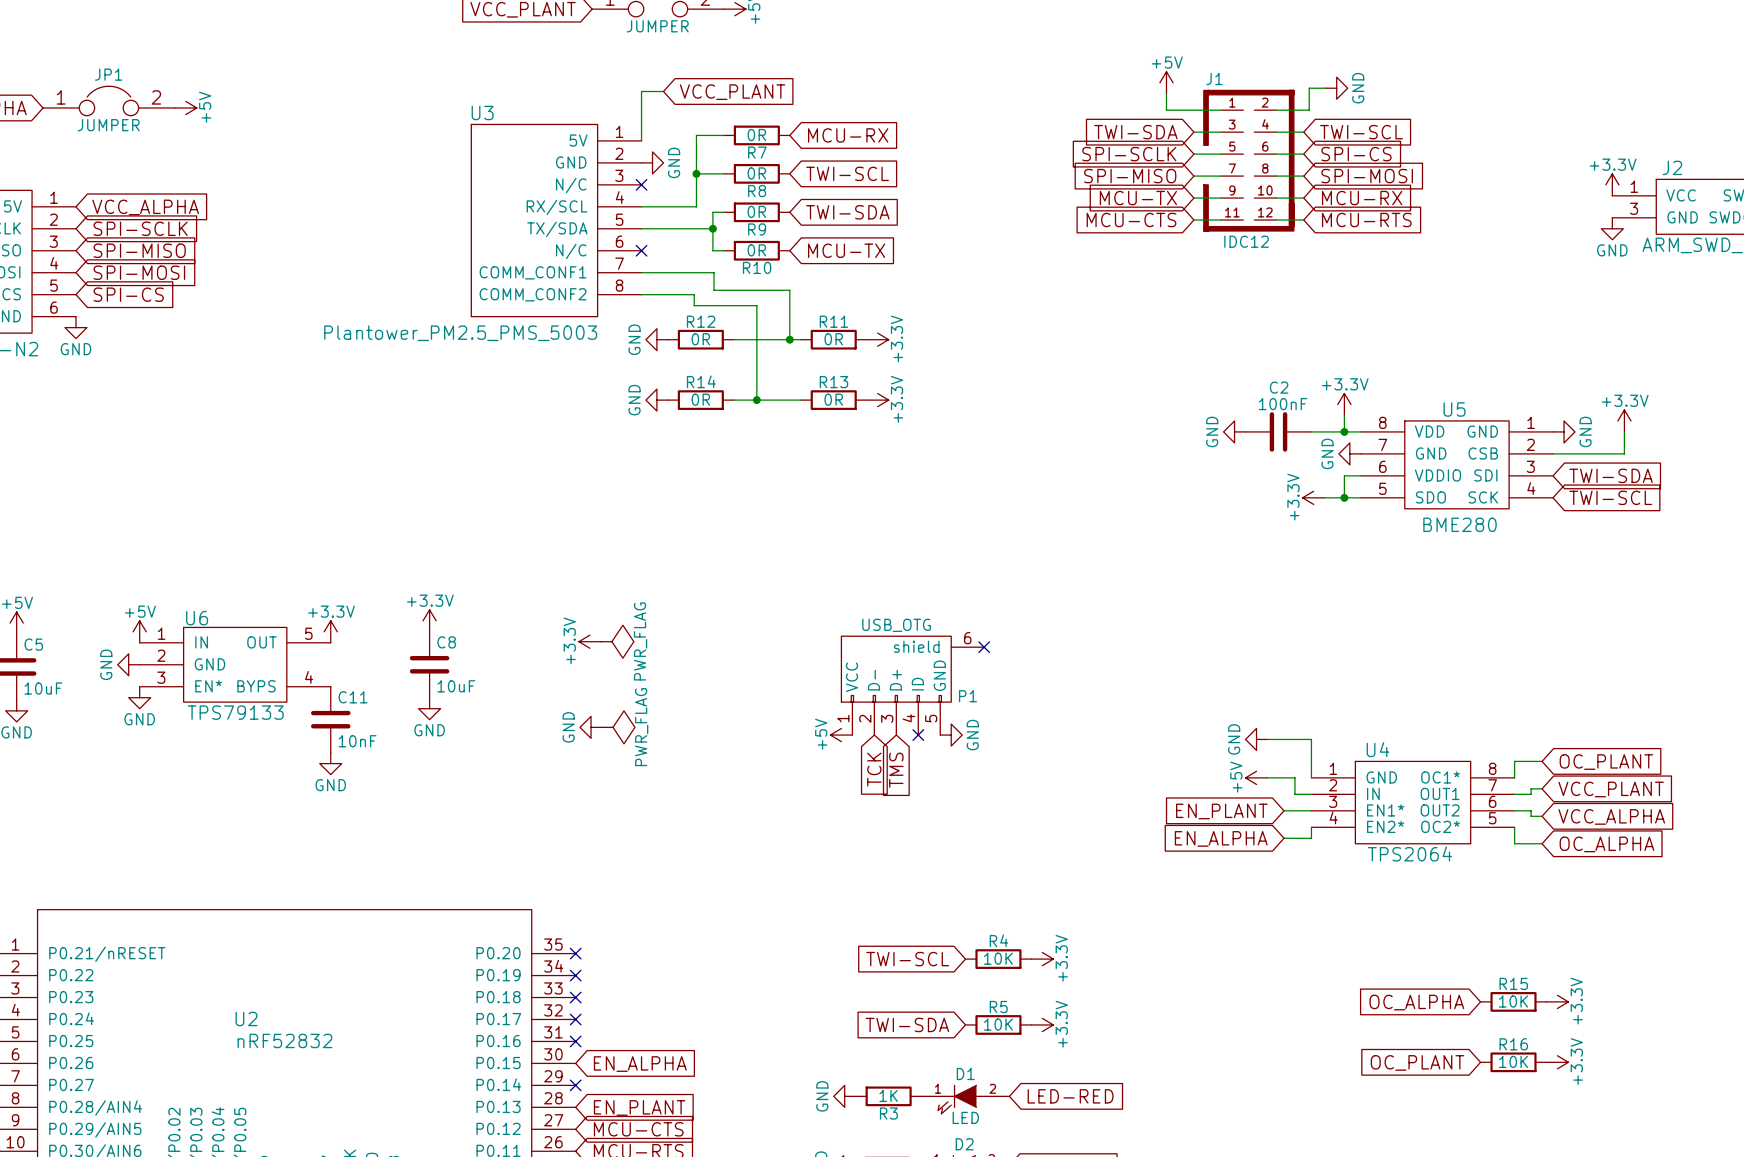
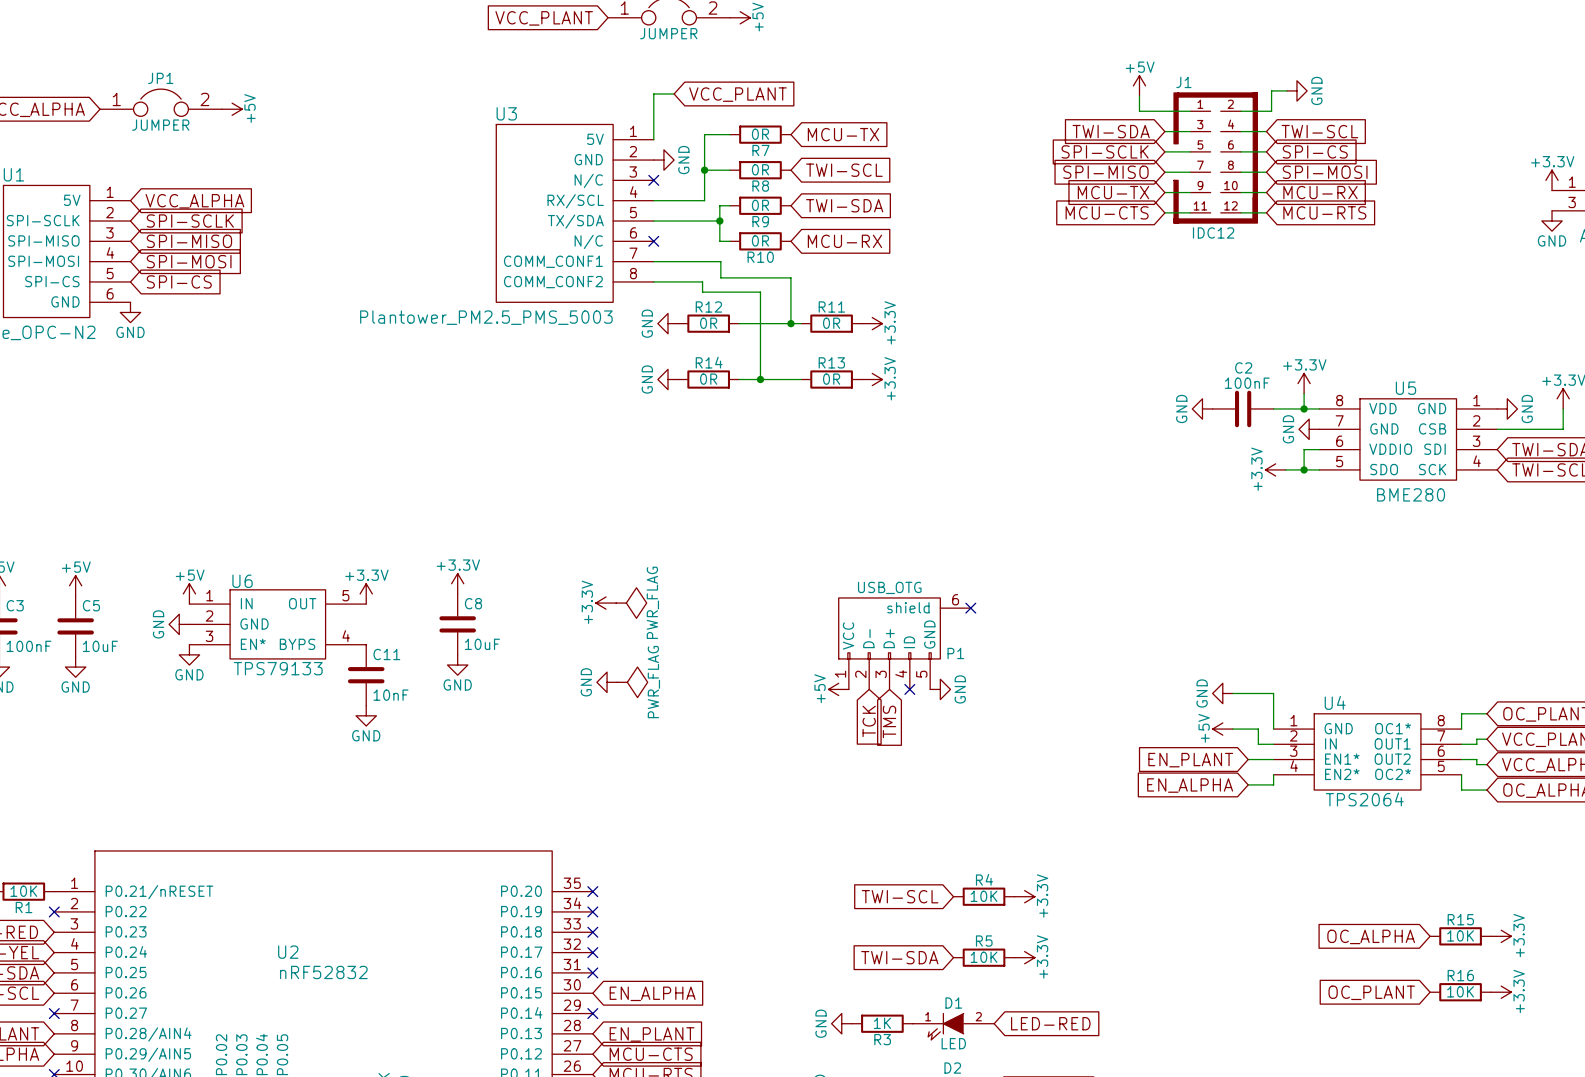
global label: MCU-RX (848, 135) -> MCU-TX (843, 134)
global label: MCU-TX (846, 250) -> MCU-RX (844, 241)

